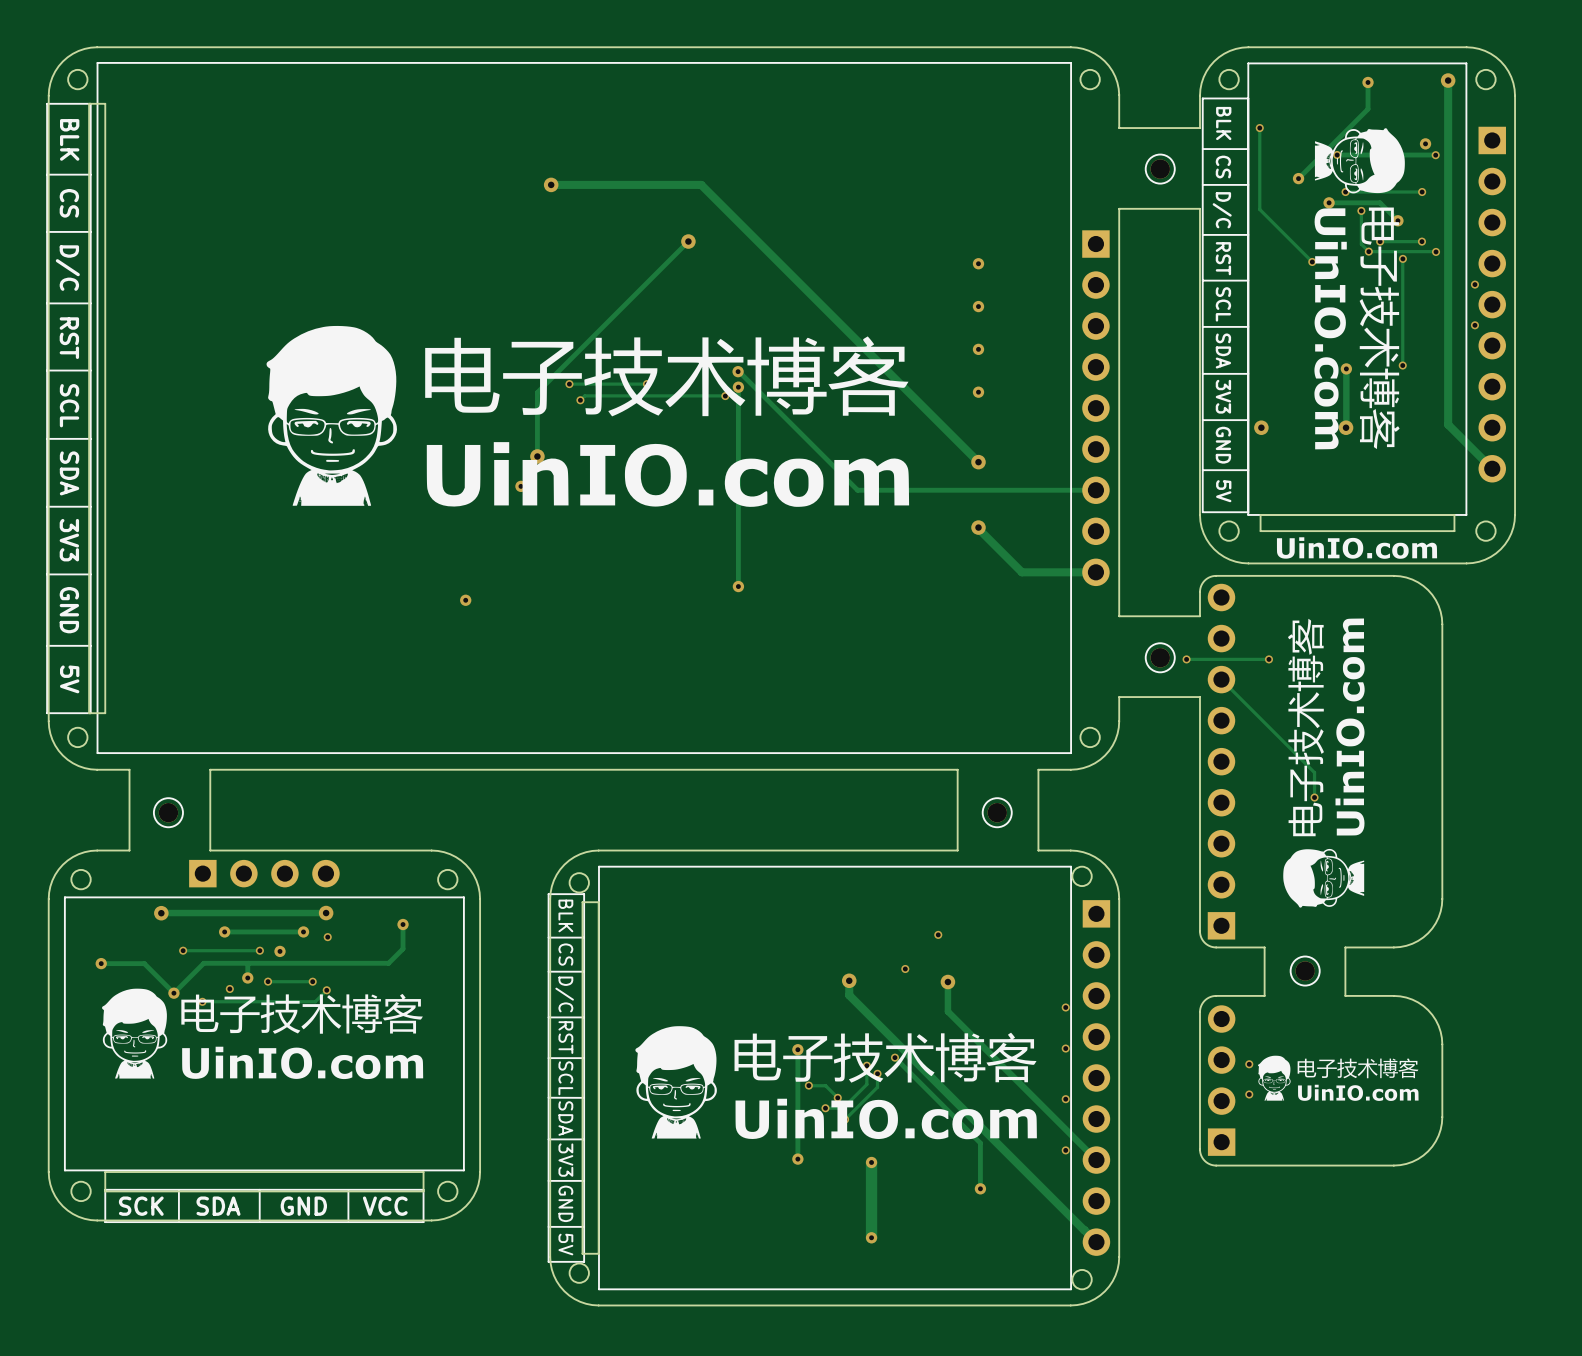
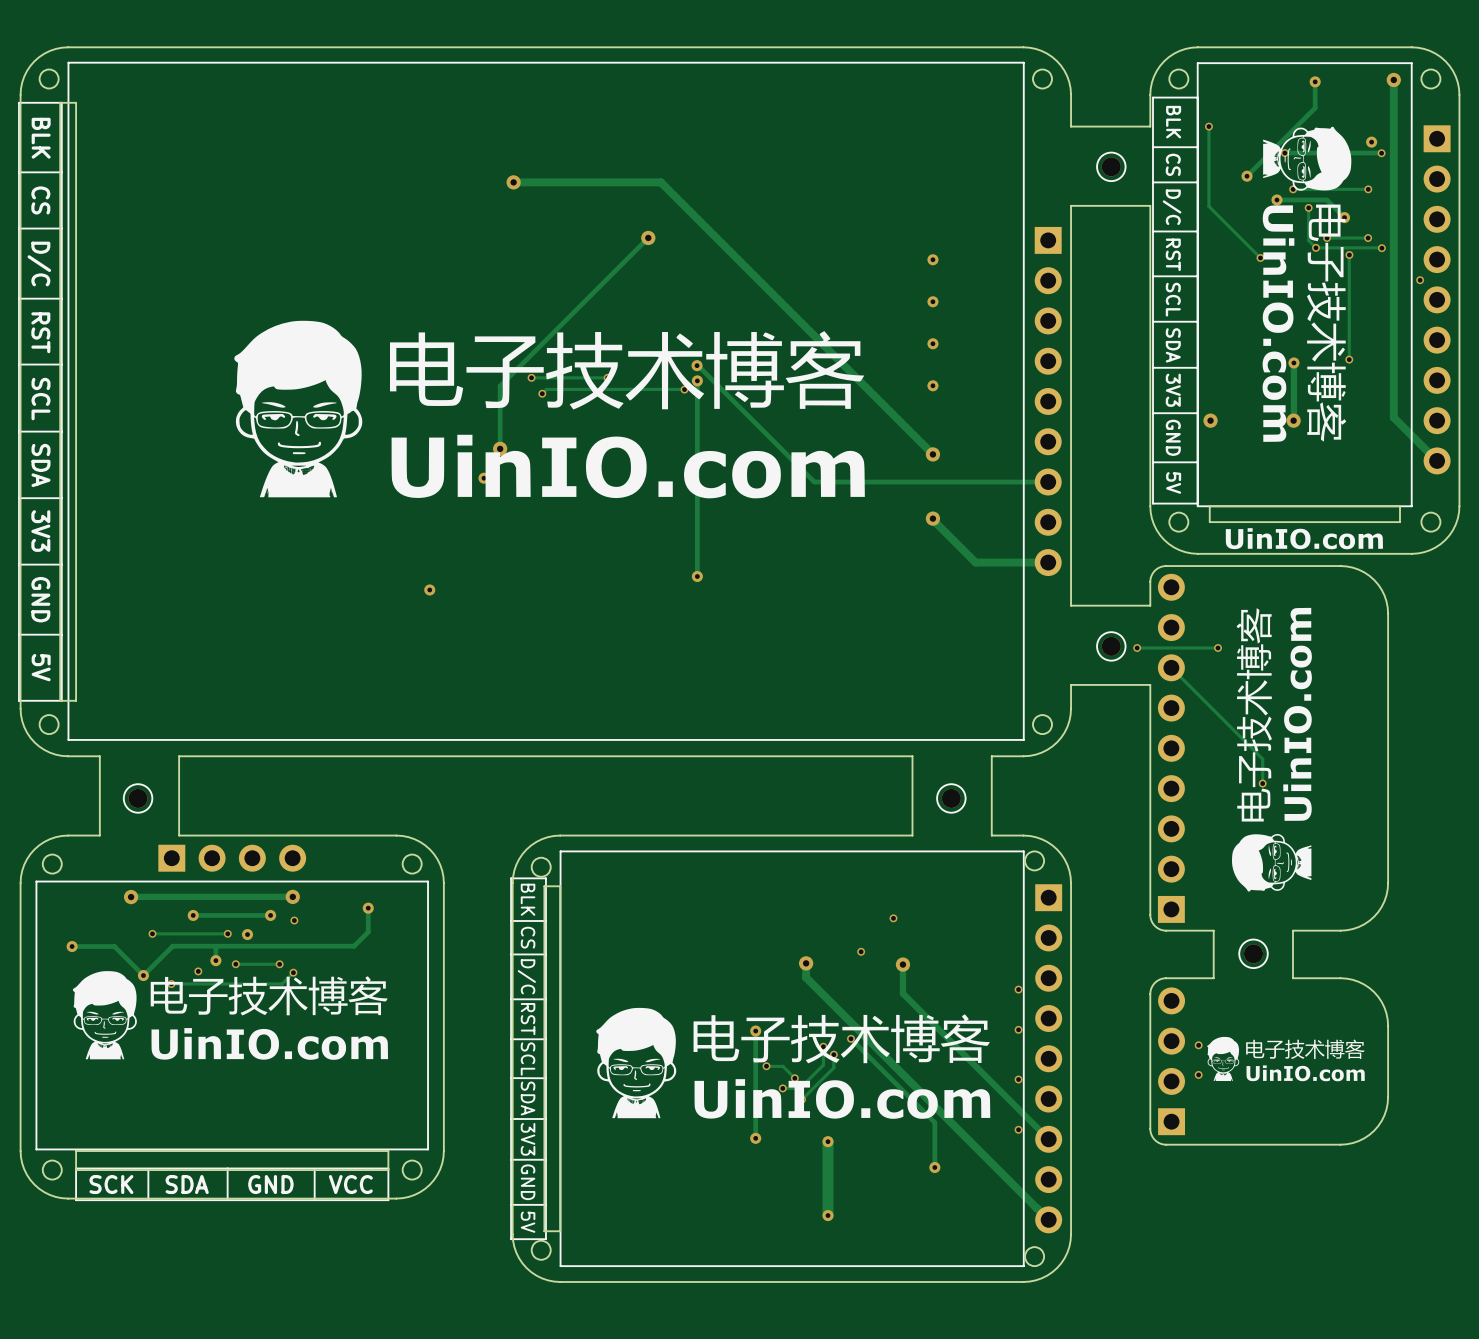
via: (1474, 325) -> none

